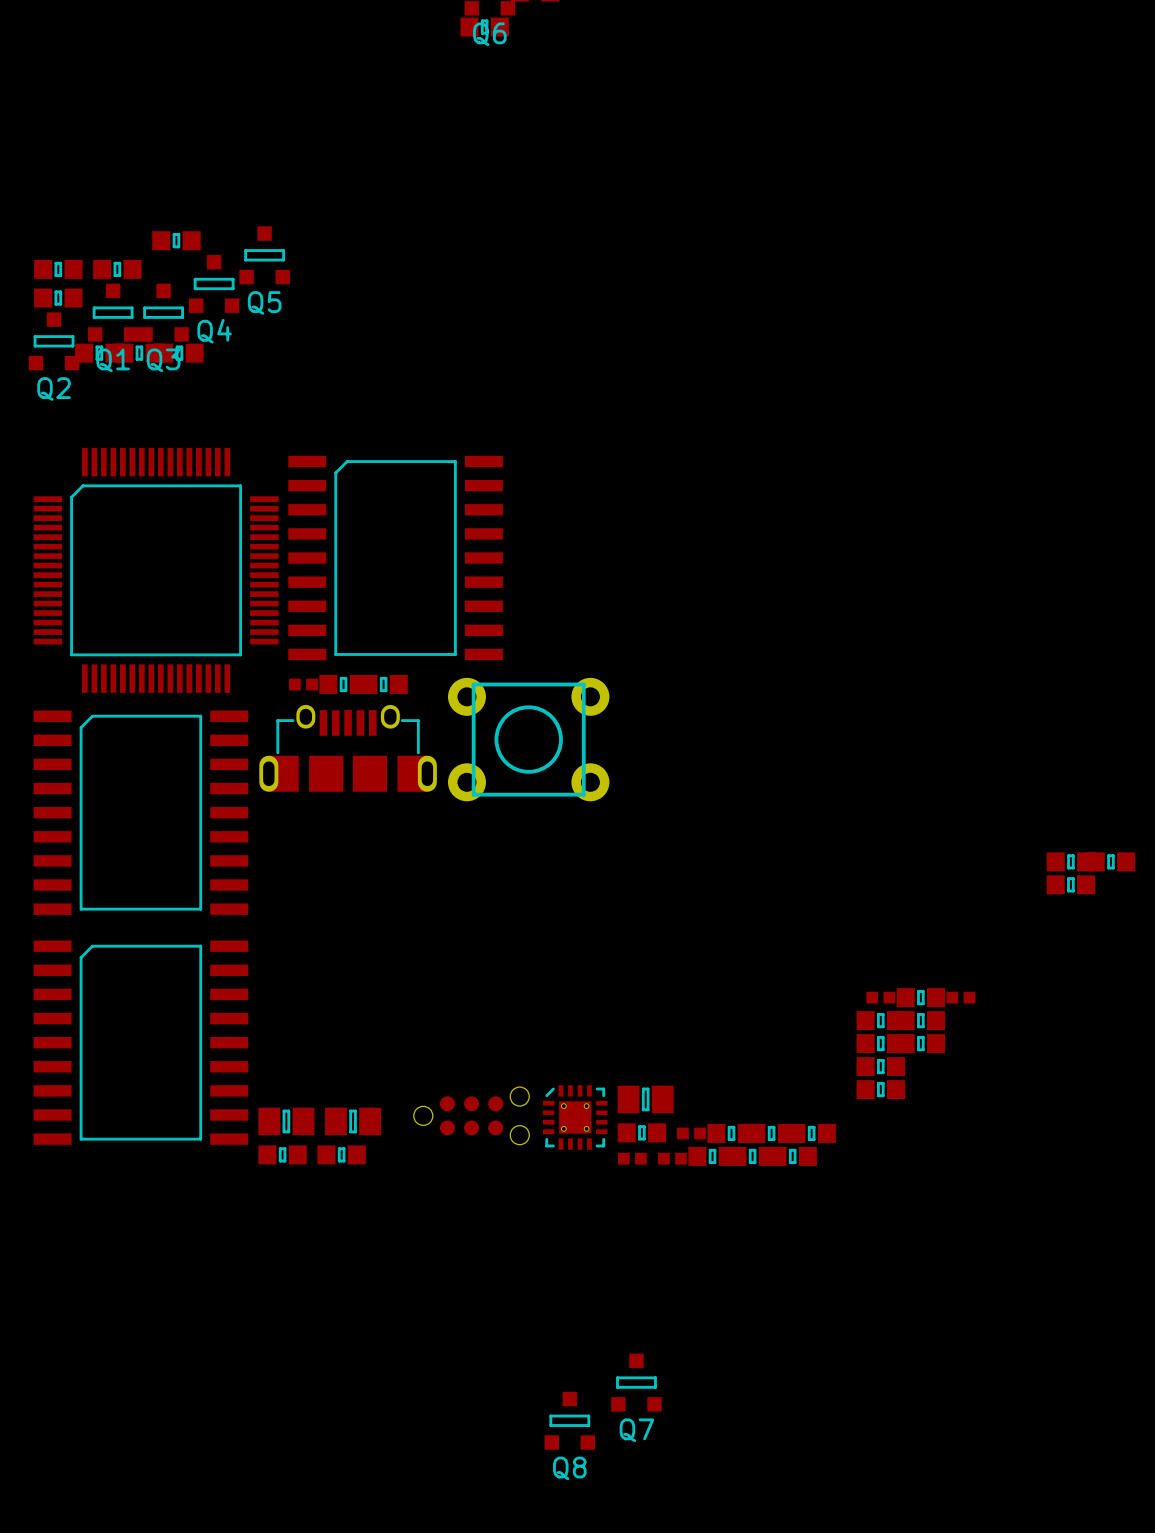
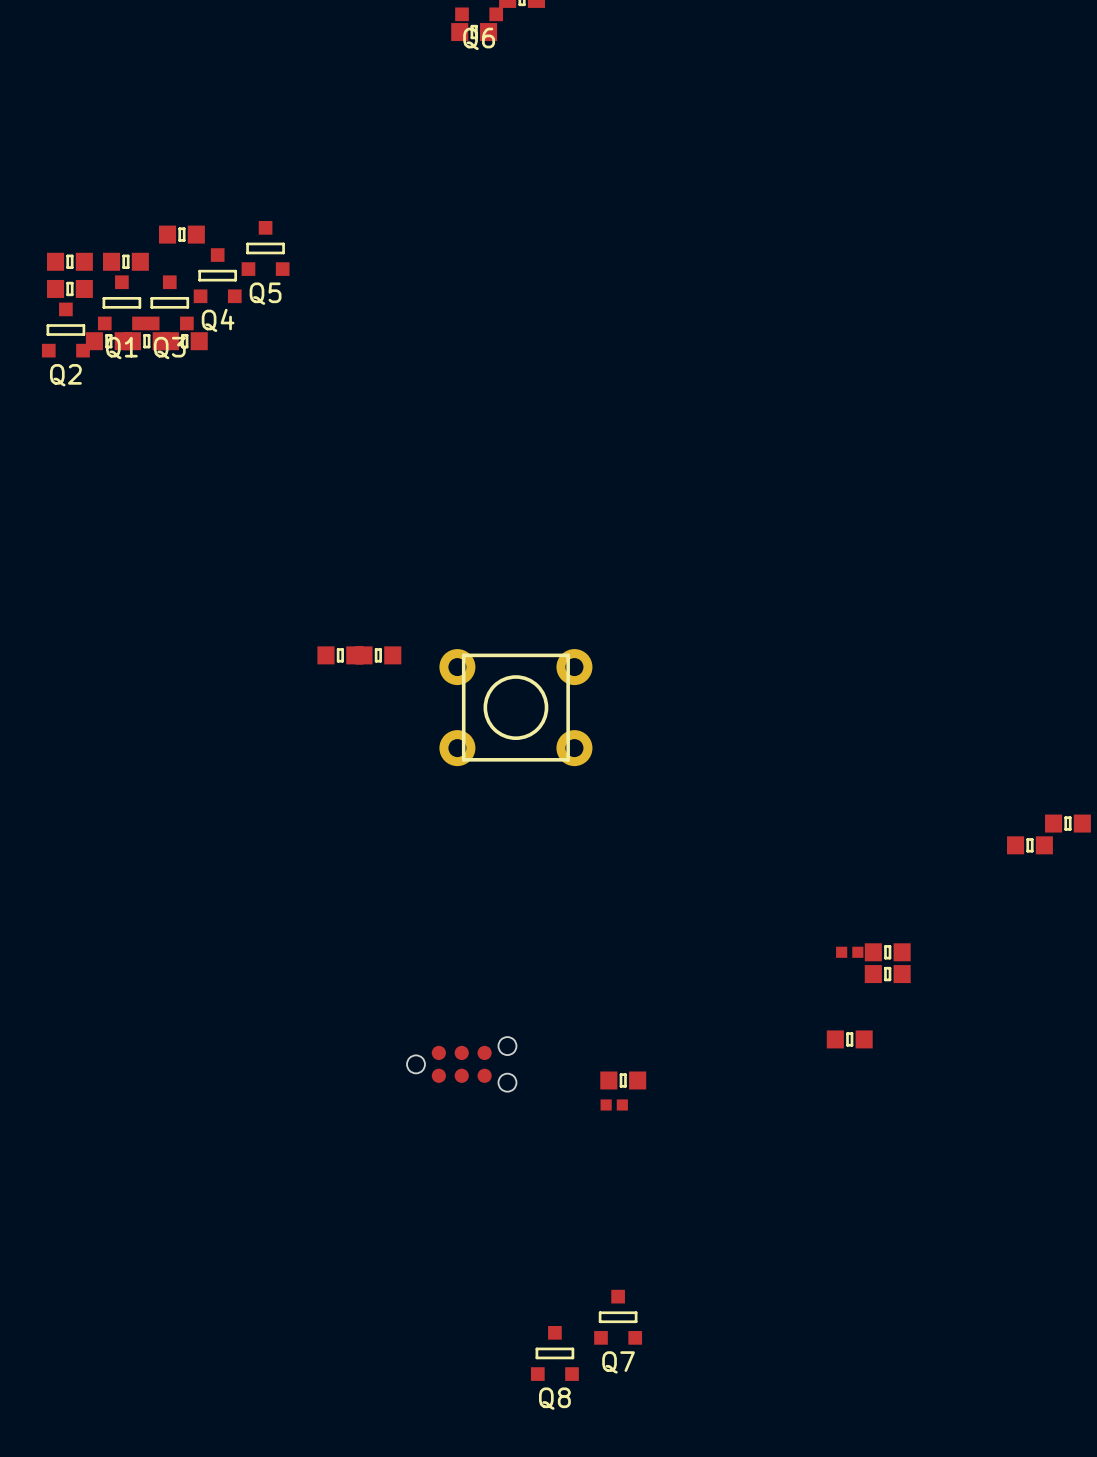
part: (395, 558) -> none
part: (156, 570) -> none
part: (303, 684) -> none
part: (348, 748) -> none
part: (140, 812) -> none
part: (1070, 861) -> none
part: (960, 997) -> none
part: (880, 1020) -> none
part: (140, 1042) -> none
part: (880, 1043) -> none
part: (920, 1043) -> none
part: (880, 1066) -> none
part: (645, 1099) -> none
part: (575, 1117) -> none
part: (286, 1121) -> none
part: (353, 1121) -> none
part: (691, 1133) -> none
part: (731, 1133) -> none
part: (771, 1133) -> none
part: (811, 1133) -> none
part: (282, 1154) -> none
part: (341, 1154) -> none
part: (712, 1156) -> none
part: (752, 1156) -> none
part: (792, 1156) -> none
part: (672, 1158) -> none

